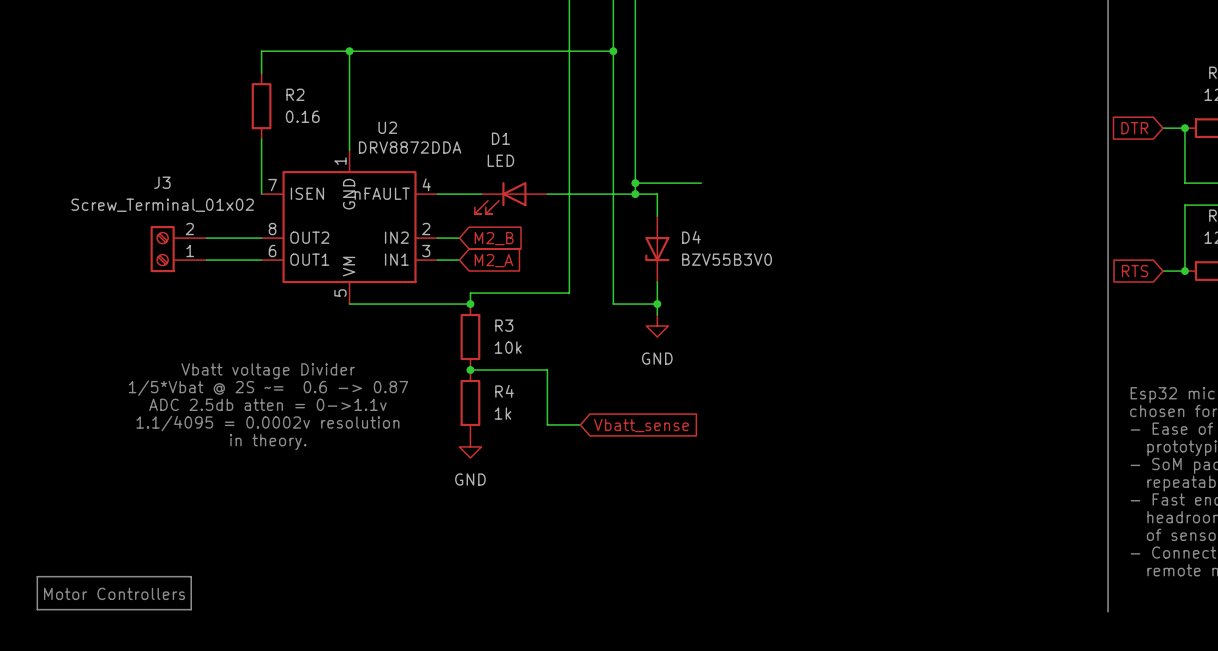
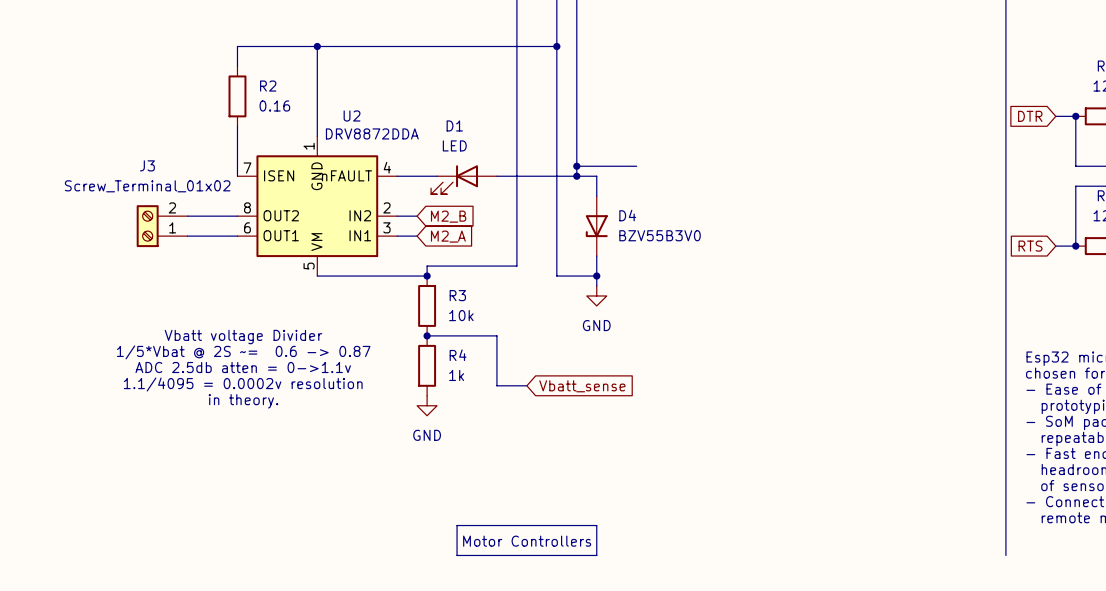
line: (37, 576) (191, 576) (191, 609) (37, 609) (37, 576) -> none
line: none -> (457, 525) (596, 525) (596, 555) (457, 555) (457, 525)
text: Motor Controllers (114, 593) -> none
text: none -> Motor Controllers (527, 541)

